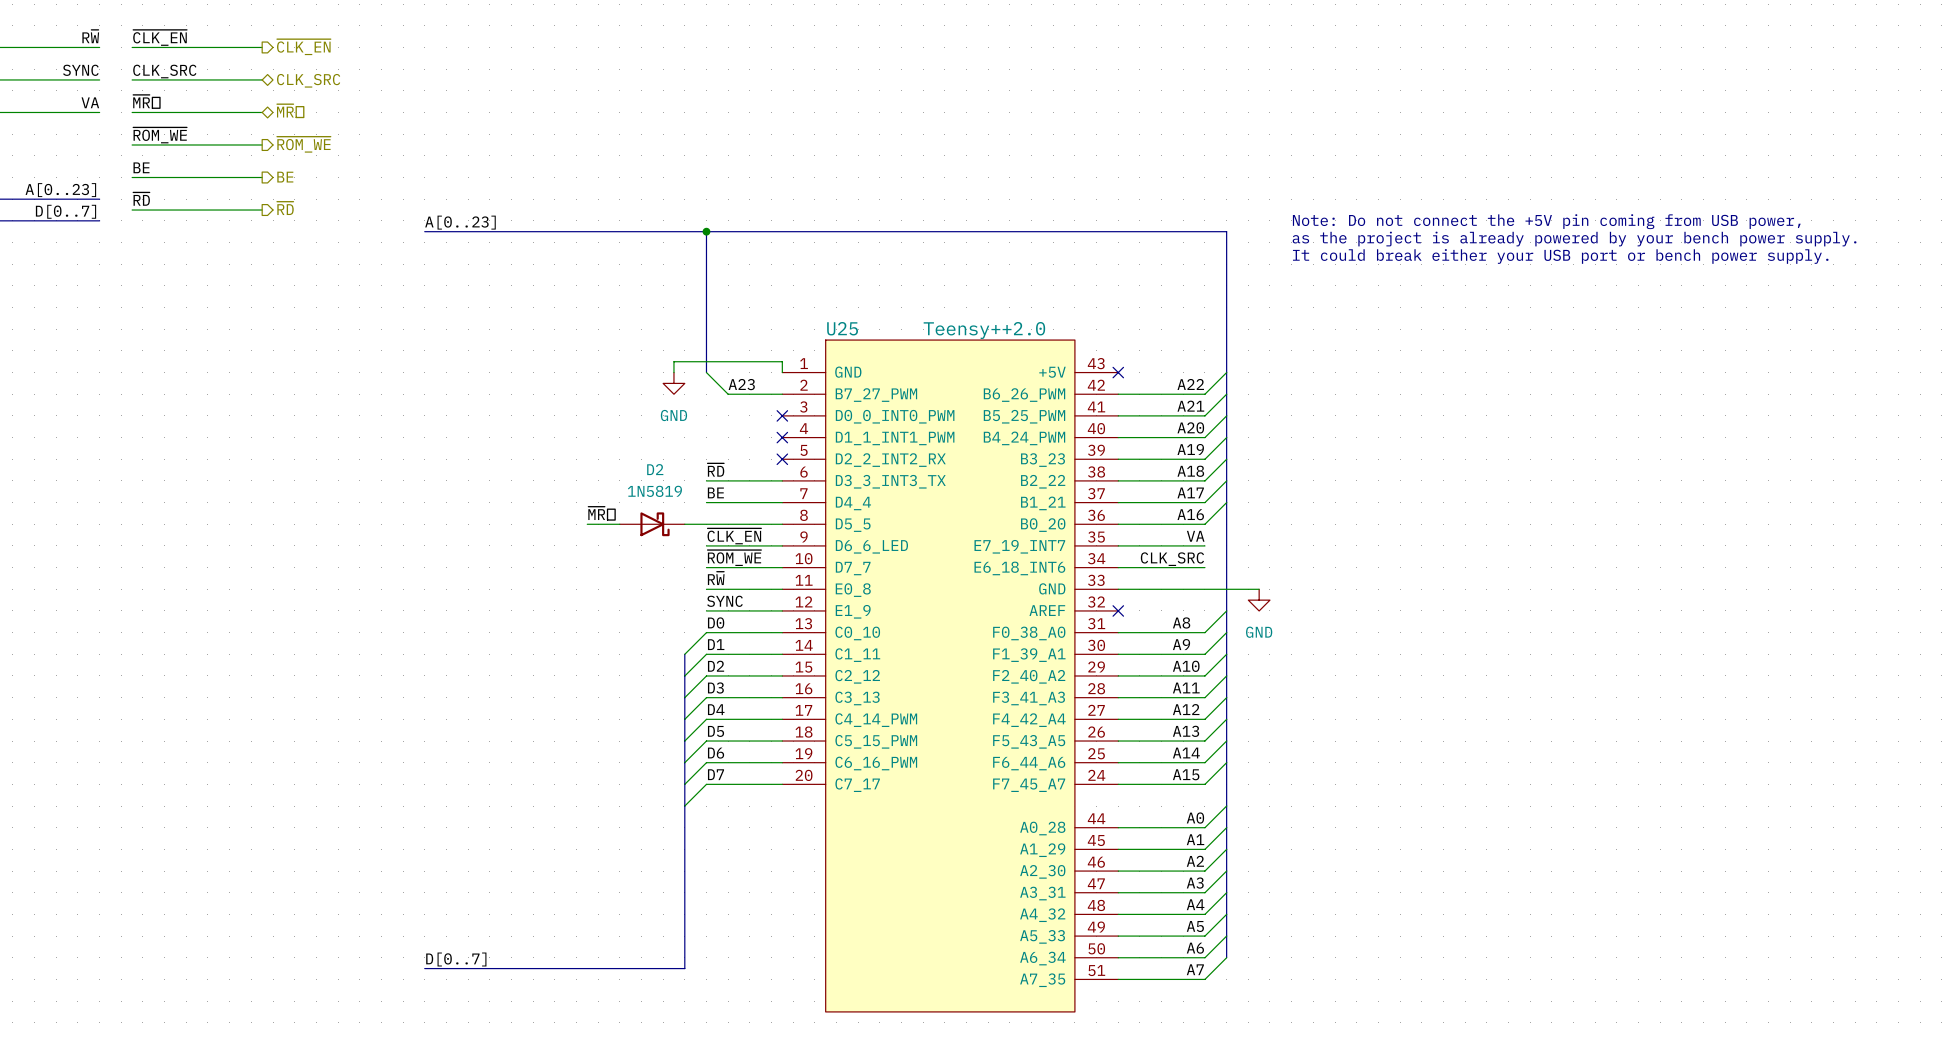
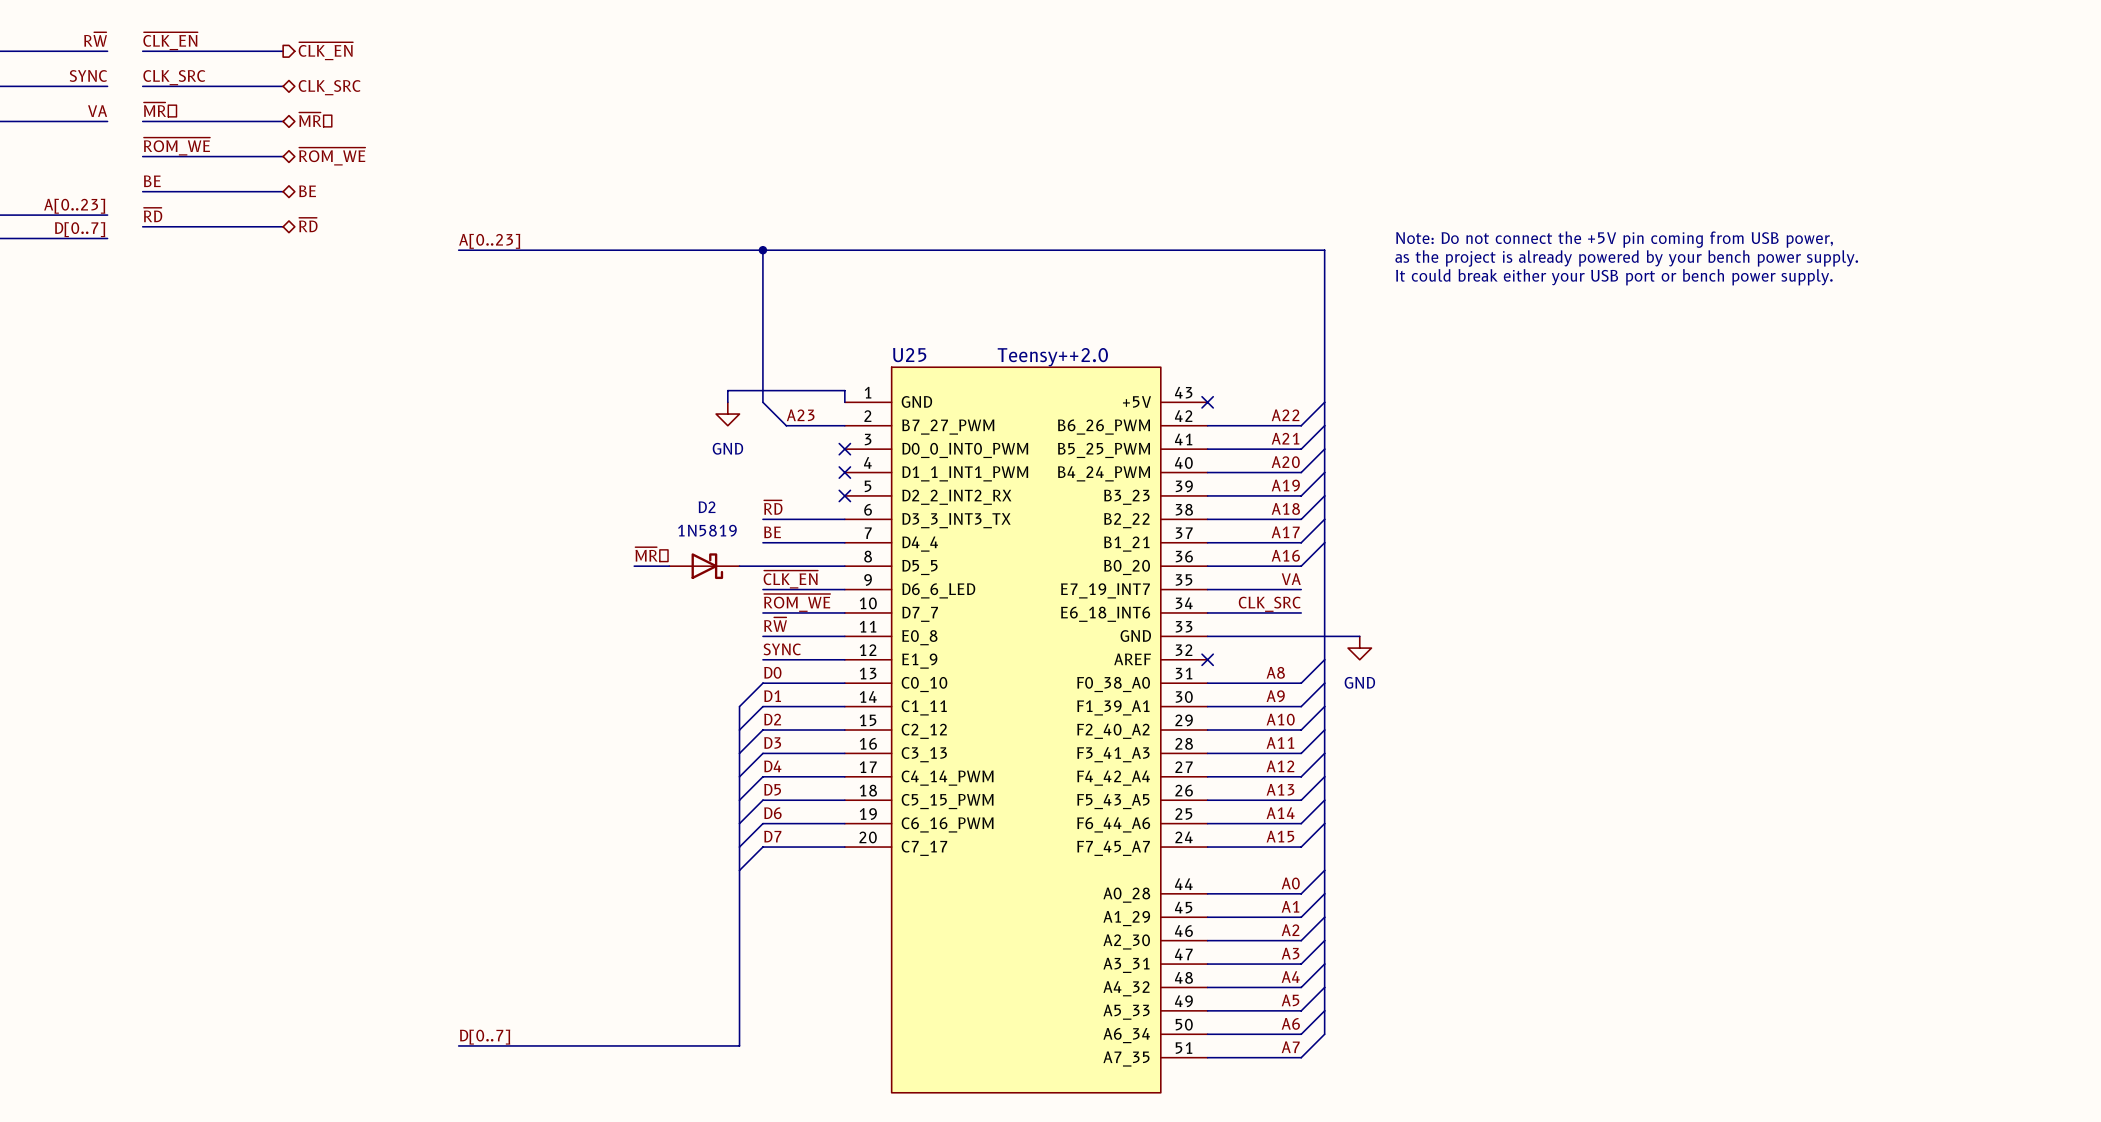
hierarchical label shape: output (303, 144) -> bidirectional (332, 156)
hierarchical label shape: output (285, 177) -> bidirectional (307, 191)
hierarchical label shape: output (285, 208) -> bidirectional (308, 225)

